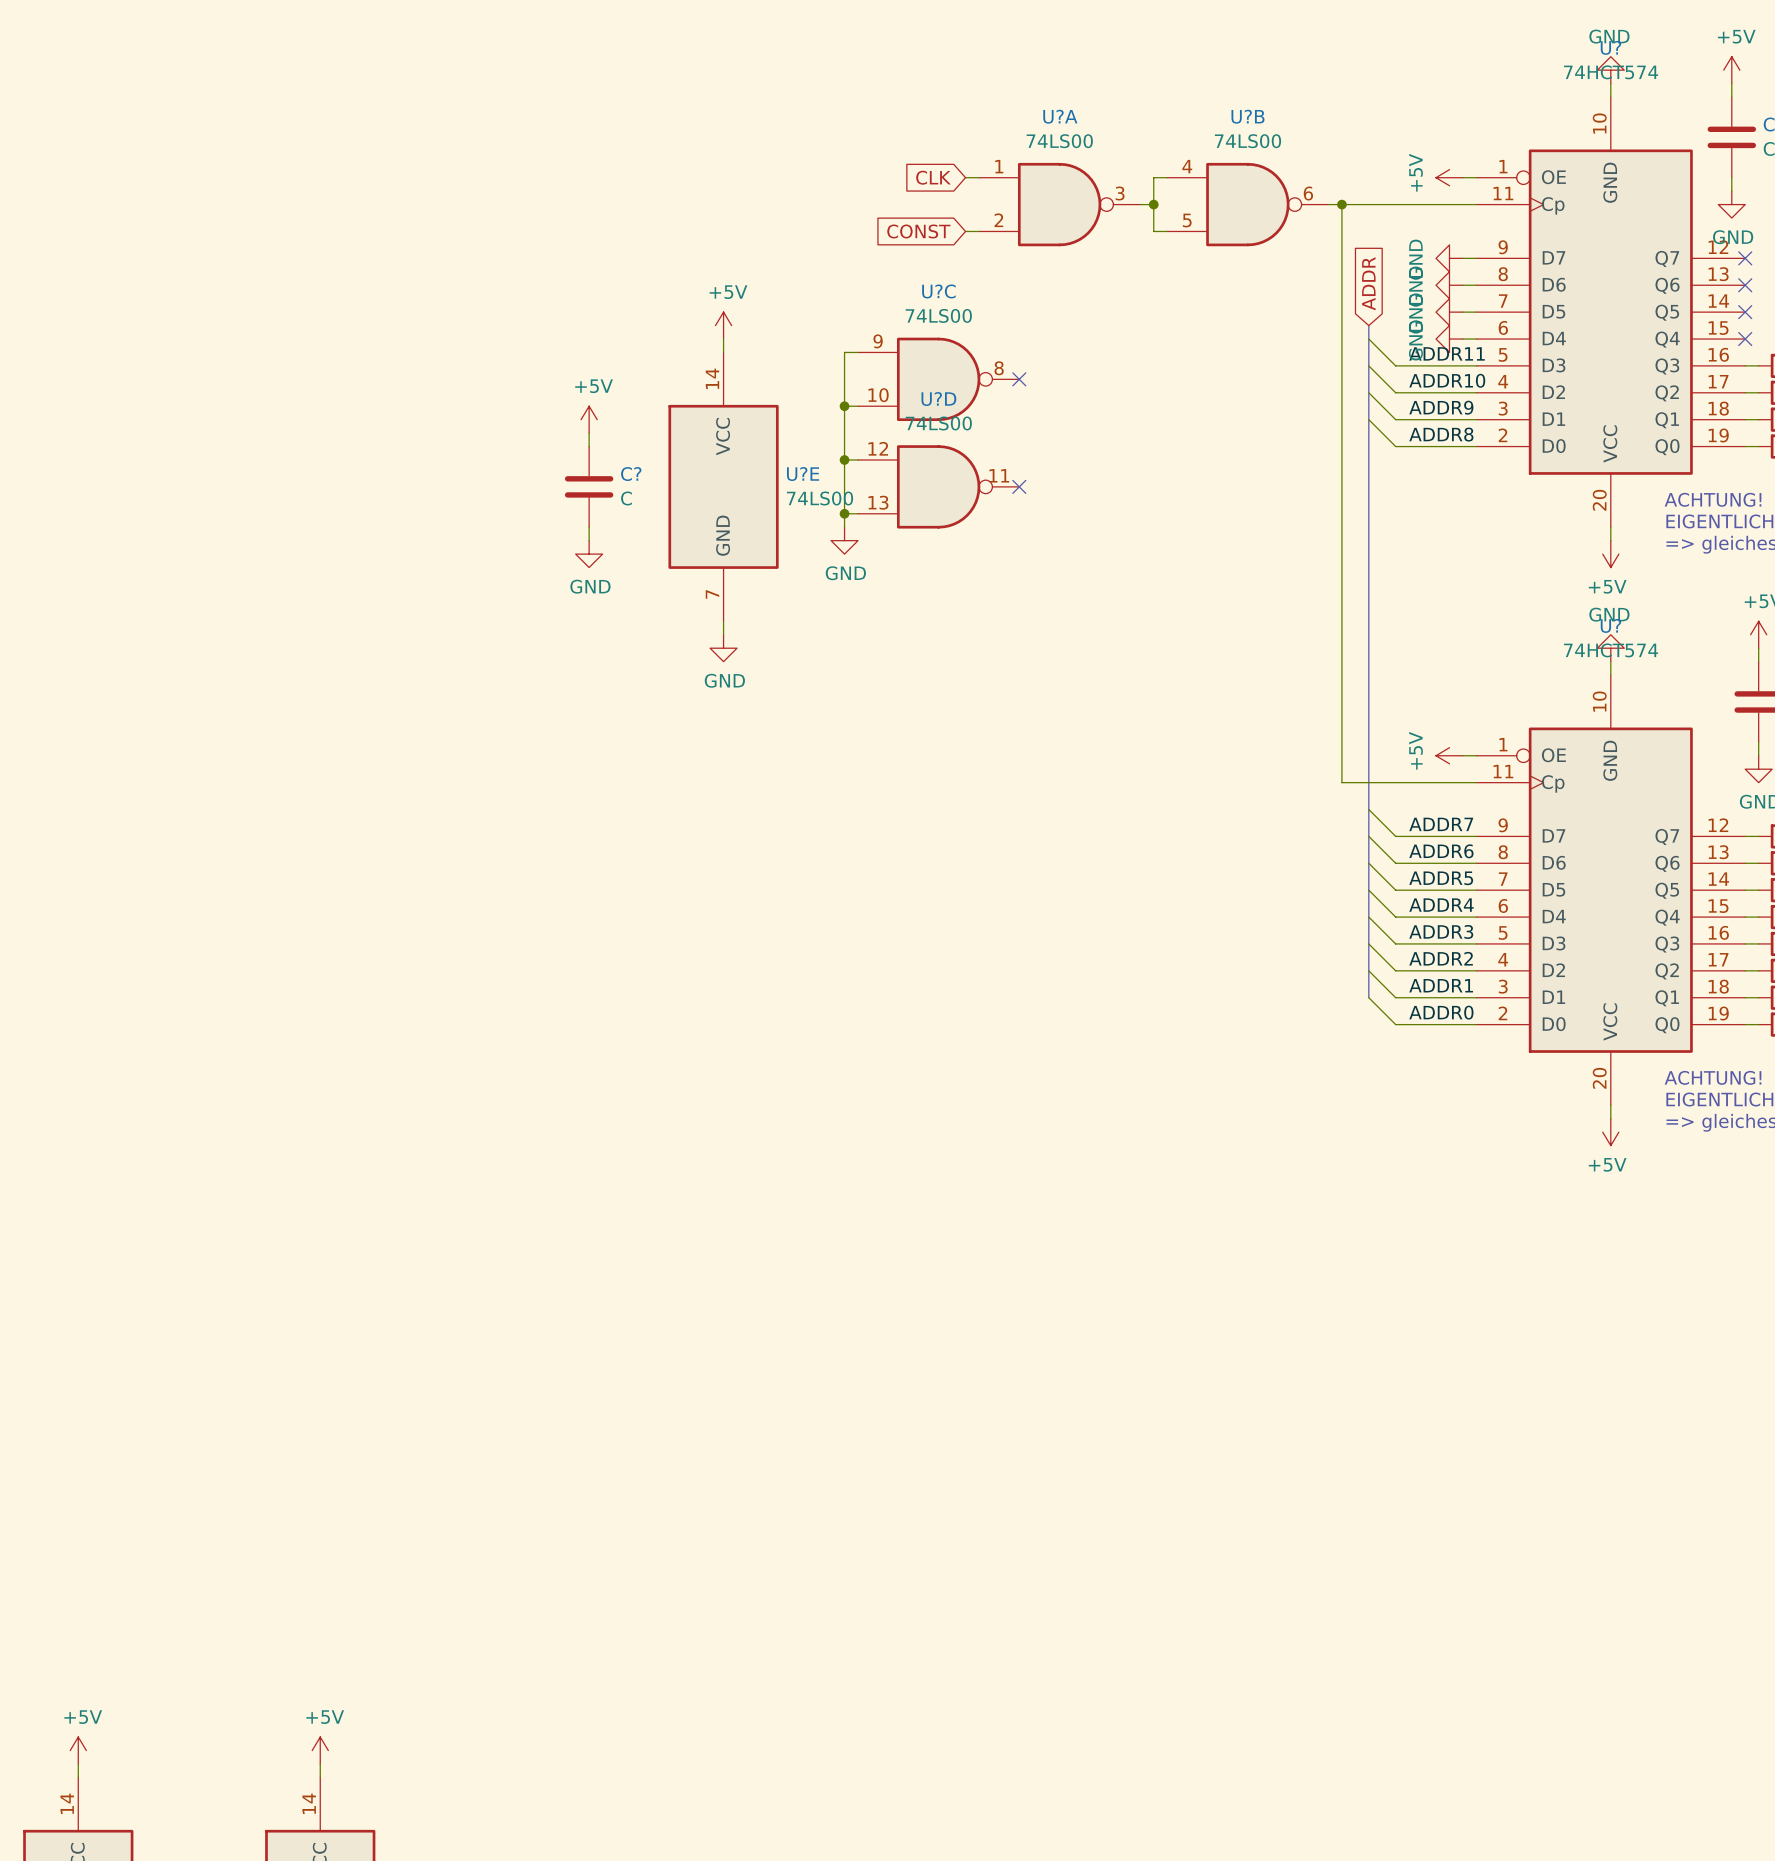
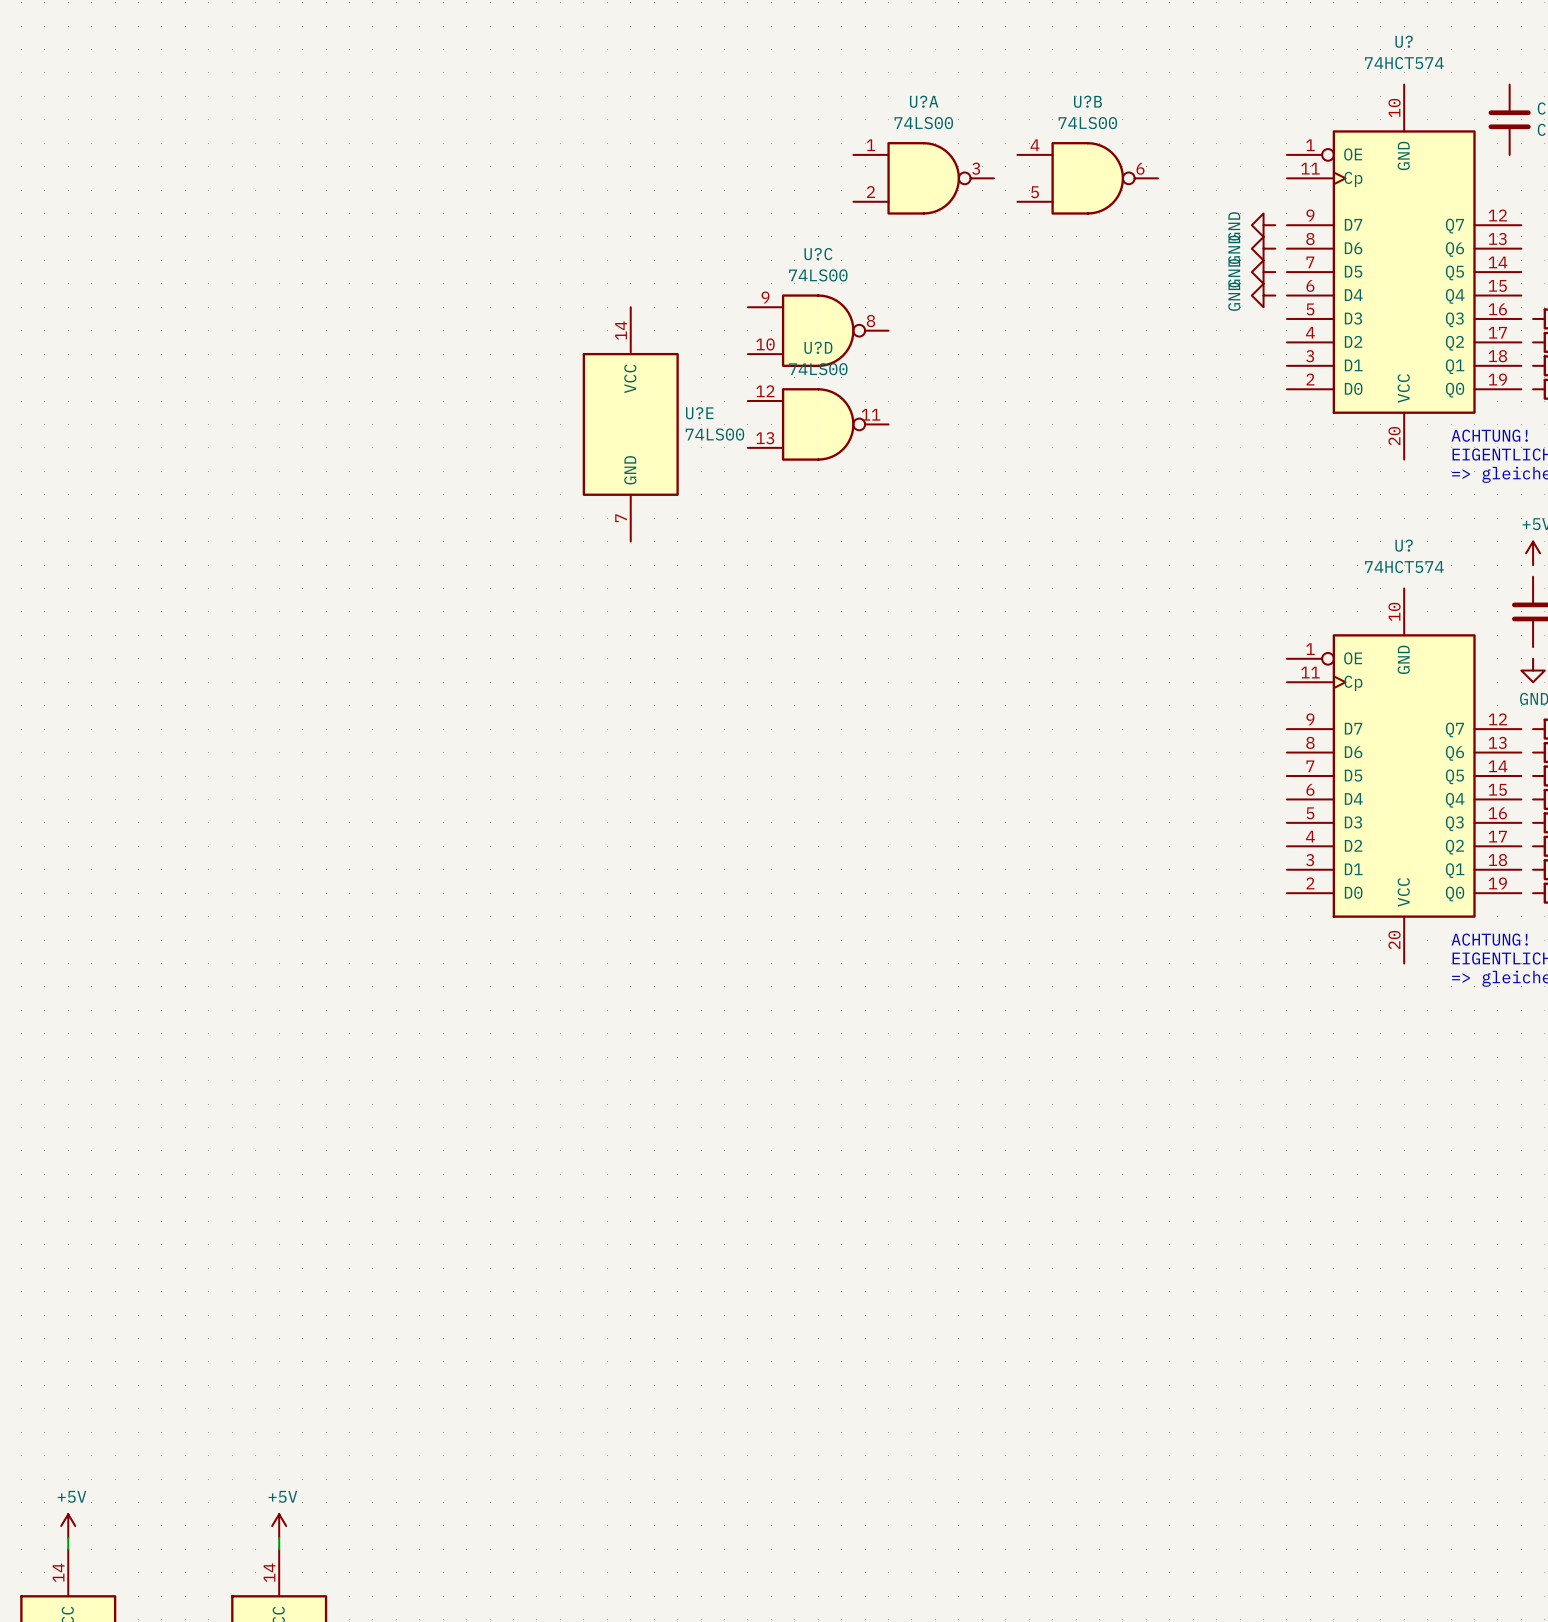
power symbol: GND (1610, 70) -> none
power symbol: +5V (1731, 70) -> none
wire: (1610, 83) (1610, 97) -> none
wire: (1731, 83) (1731, 97) -> none
global label: CLK (933, 177) -> none
wire: (965, 177) (978, 177) -> none
wire: (1167, 177) (1153, 177) (1153, 231) (1167, 231) -> none
power symbol: +5V (1449, 177) -> none
wire: (1462, 177) (1476, 177) -> none
wire: (1731, 177) (1731, 191) -> none
wire: (1140, 204) (1153, 204) -> none
junction: (1153, 204) -> none
wire: (1328, 204) (1476, 204) -> none
wire: (1341, 204) (1341, 782) (1476, 782) -> none
junction: (1341, 204) -> none
power symbol: GND (1731, 204) -> none
global label: CONST (918, 231) -> none
wire: (965, 231) (978, 231) -> none
wire: (1462, 258) (1476, 258) -> none
no-connect mark: (1745, 258) -> none
global label: ADDR (1368, 283) -> none
wire: (1462, 285) (1476, 285) -> none
no-connect mark: (1745, 285) -> none
wire: (1462, 312) (1476, 312) -> none
no-connect mark: (1745, 312) -> none
power symbol: +5V (723, 325) -> none
bus: (1368, 325) (1368, 997) -> none
wire: (723, 339) (723, 352) -> none
wire: (1368, 339) (1395, 365) (1476, 365) -> none
wire: (1462, 339) (1476, 339) -> none
no-connect mark: (1745, 339) -> none
wire: (857, 352) (844, 352) (844, 527) -> none
label: ADDR11 (1447, 353) -> none
wire: (1368, 365) (1395, 392) (1476, 392) -> none
wire: (1745, 365) (1758, 365) -> none
no-connect mark: (1019, 379) -> none
label: ADDR10 (1447, 380) -> none
wire: (1368, 392) (1395, 419) (1476, 419) -> none
wire: (1745, 392) (1758, 392) -> none
wire: (844, 406) (857, 406) -> none
junction: (844, 406) -> none
label: ADDR9 (1441, 407) -> none
power symbol: +5V (589, 419) -> none
wire: (1368, 419) (1395, 446) (1476, 446) -> none
wire: (1745, 419) (1758, 419) -> none
wire: (589, 433) (589, 446) -> none
label: ADDR8 (1441, 434) -> none
wire: (1745, 446) (1758, 446) -> none
wire: (844, 460) (857, 460) -> none
junction: (844, 460) -> none
C?: C (589, 486) -> none
no-connect mark: (1019, 486) -> none
wire: (844, 513) (857, 513) -> none
junction: (844, 513) -> none
wire: (589, 527) (589, 540) -> none
wire: (1610, 527) (1610, 540) -> none
power symbol: GND (844, 540) -> none
power symbol: GND (589, 554) -> none
power symbol: +5V (1610, 554) -> none
wire: (723, 621) (723, 634) -> none
power symbol: GND (723, 648) -> none
power symbol: GND (1610, 648) -> none
wire: (1758, 648) (1758, 661) -> none
wire: (1610, 661) (1610, 675) -> none
wire: (1758, 742) (1758, 755) -> none
power symbol: +5V (1449, 755) -> none
wire: (1462, 755) (1476, 755) -> none
wire: (1368, 809) (1395, 836) (1476, 836) -> none
label: ADDR7 (1441, 824) -> none
wire: (1368, 836) (1395, 863) (1476, 863) -> none
wire: (1745, 836) (1758, 836) -> none
label: ADDR6 (1441, 851) -> none
wire: (1368, 863) (1395, 890) (1476, 890) -> none
wire: (1745, 863) (1758, 863) -> none
label: ADDR5 (1441, 878) -> none
wire: (1368, 890) (1395, 917) (1476, 917) -> none
wire: (1745, 890) (1758, 890) -> none
label: ADDR4 (1441, 905) -> none
wire: (1368, 917) (1395, 943) (1476, 943) -> none
wire: (1745, 917) (1758, 917) -> none
label: ADDR3 (1441, 931) -> none
wire: (1368, 943) (1395, 970) (1476, 970) -> none
wire: (1745, 943) (1758, 943) -> none
label: ADDR2 (1441, 958) -> none
wire: (1368, 970) (1395, 997) (1476, 997) -> none
wire: (1745, 970) (1758, 970) -> none
label: ADDR1 (1441, 985) -> none
wire: (1368, 997) (1395, 1024) (1476, 1024) -> none
wire: (1745, 997) (1758, 997) -> none
label: ADDR0 (1441, 1012) -> none
wire: (1745, 1024) (1758, 1024) -> none
wire: (1610, 1105) (1610, 1118) -> none
power symbol: +5V (1610, 1132) -> none

